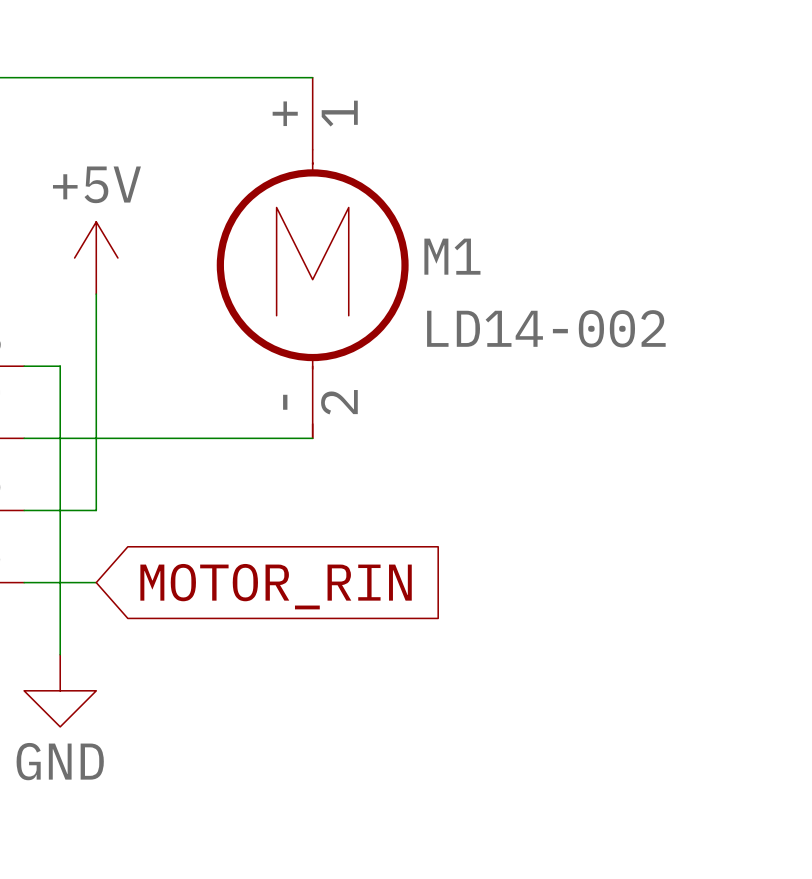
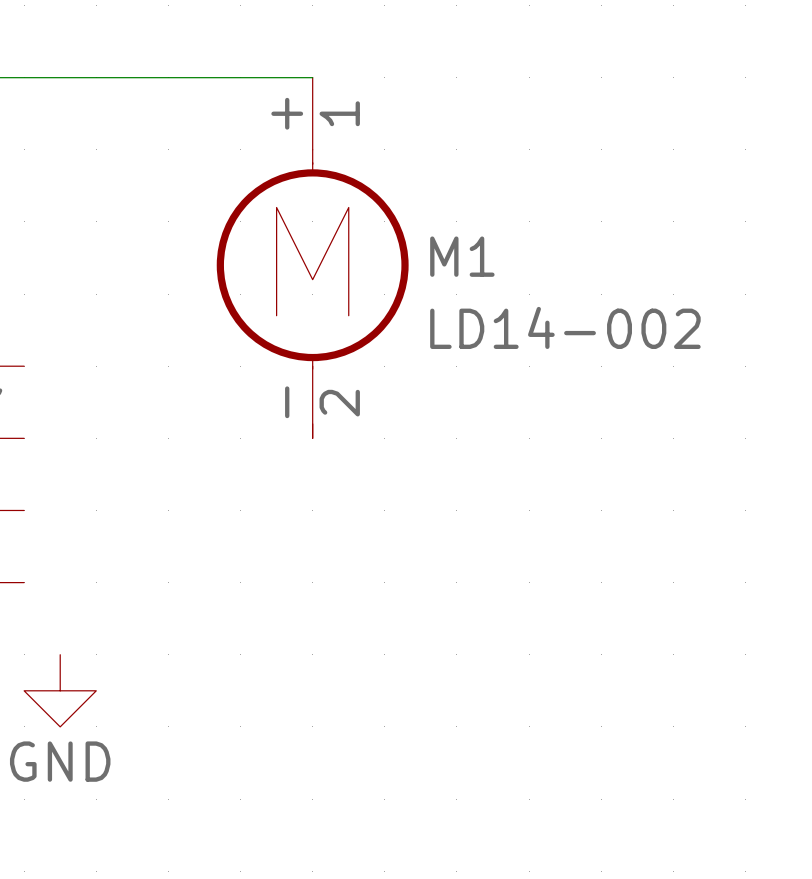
power symbol: +5V (96, 258) -> none
wire: (96, 294) (96, 510) (24, 510) -> none
wire: (24, 366) (60, 366) (60, 654) -> none
wire: (24, 438) (312, 438) -> none
wire: (24, 582) (96, 582) -> none
global label: MOTOR_RIN (276, 586) -> none

